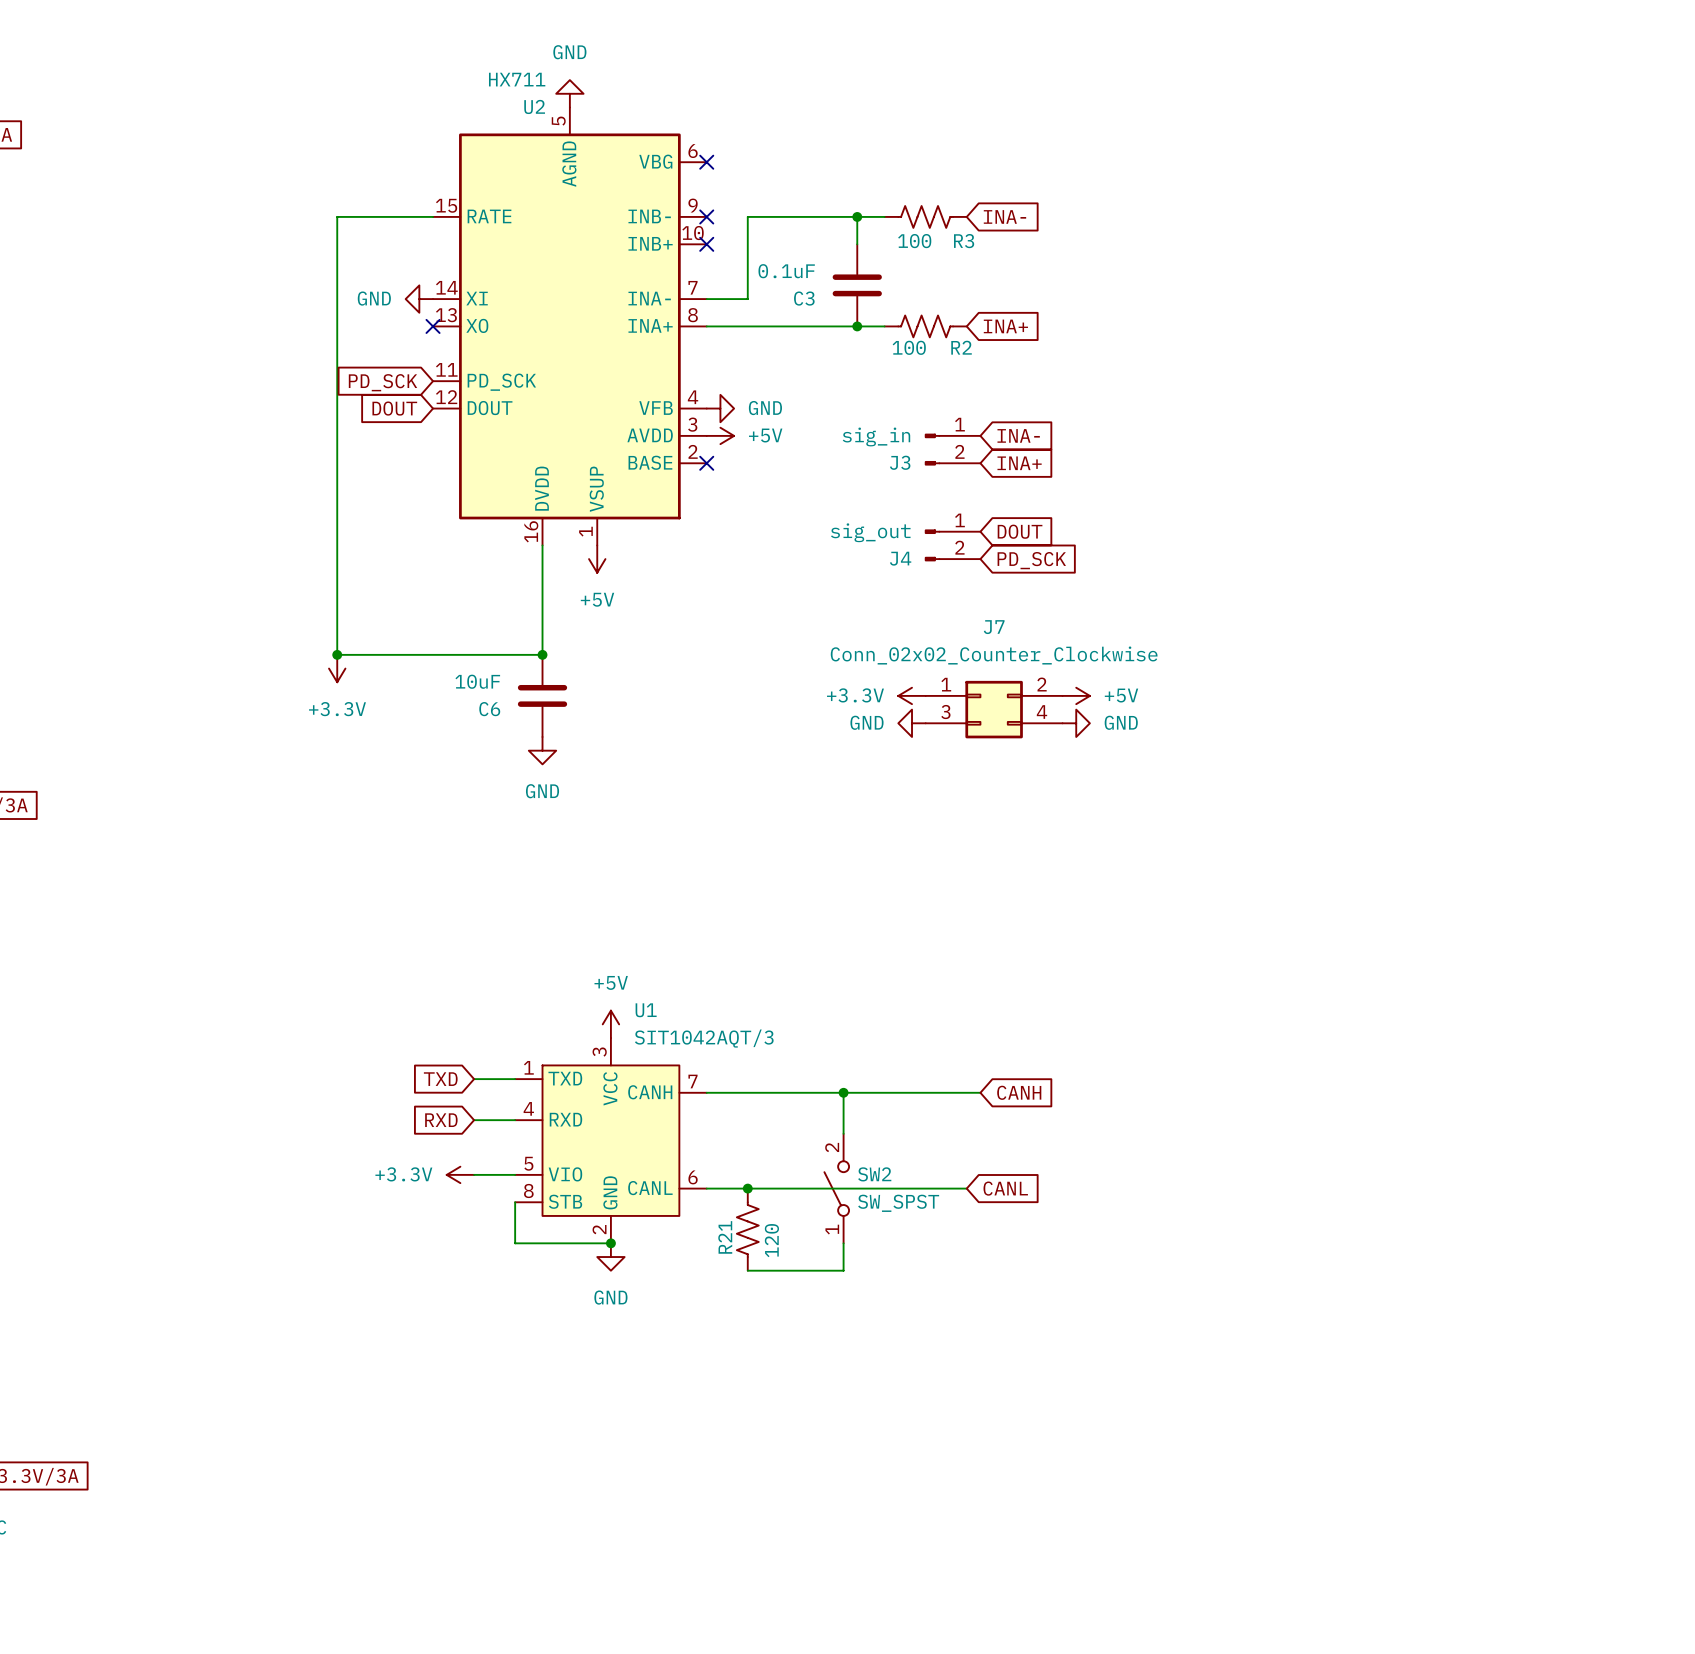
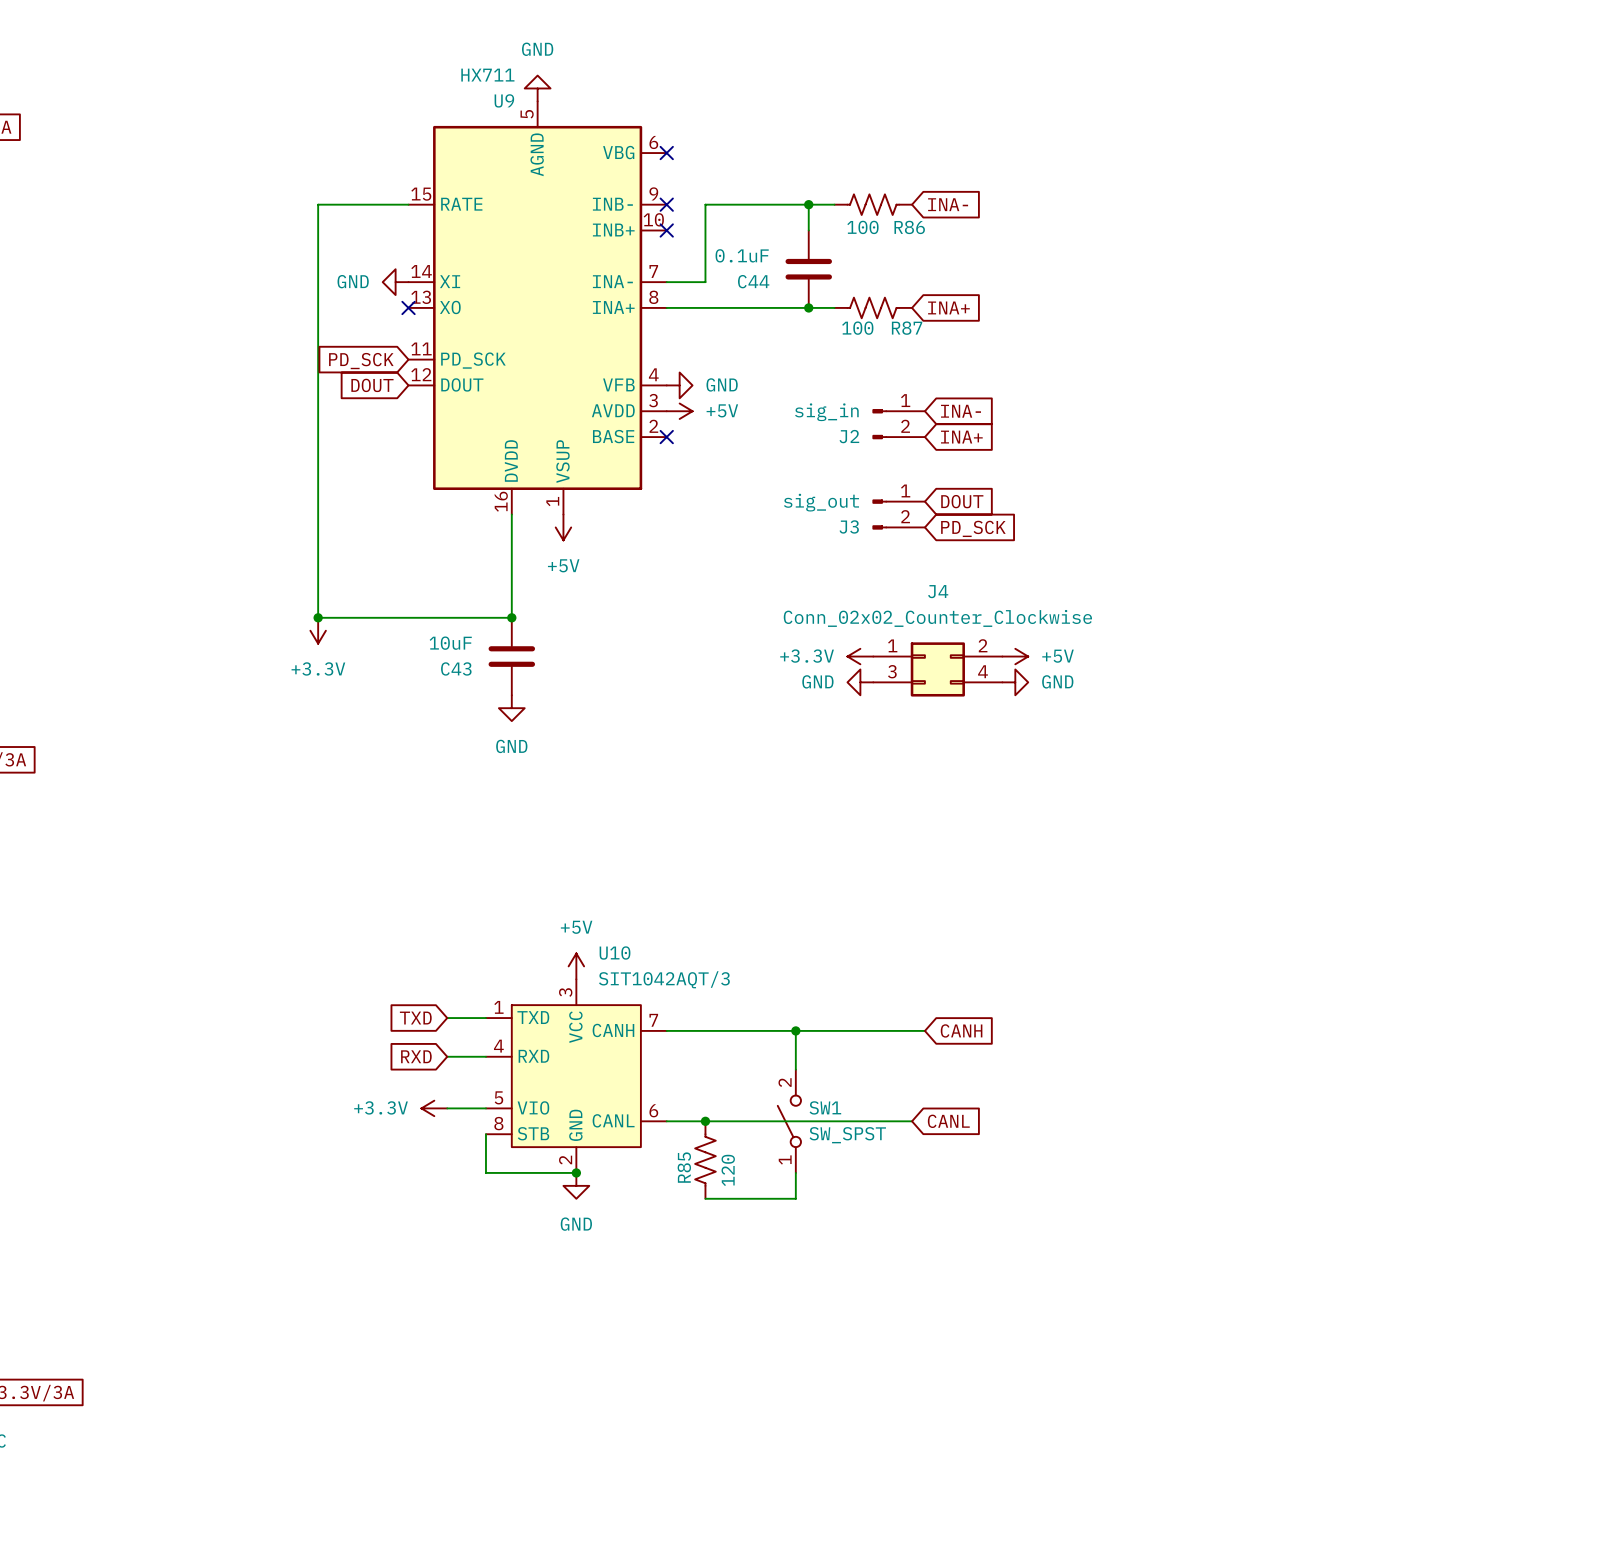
U2 name: U2 (534, 106) -> U9 (504, 100)
R3 name: R3 (964, 241) -> R86 (909, 227)
C3 name: C3 (804, 298) -> C44 (753, 281)
R2 name: R2 (961, 347) -> R87 (907, 328)
J3 name: J3 (900, 462) -> J2 (849, 436)
J4 name: J4 (900, 558) -> J3 (849, 526)
J7 name: J7 (994, 627) -> J4 (938, 591)
C6 name: C6 (489, 709) -> C43 (456, 668)
U1 name: U1 (646, 1010) -> U10 (615, 953)
SW2 name: SW2 (874, 1174) -> SW1 (825, 1107)
R21 name: R21 (725, 1237) -> R85 (684, 1167)

